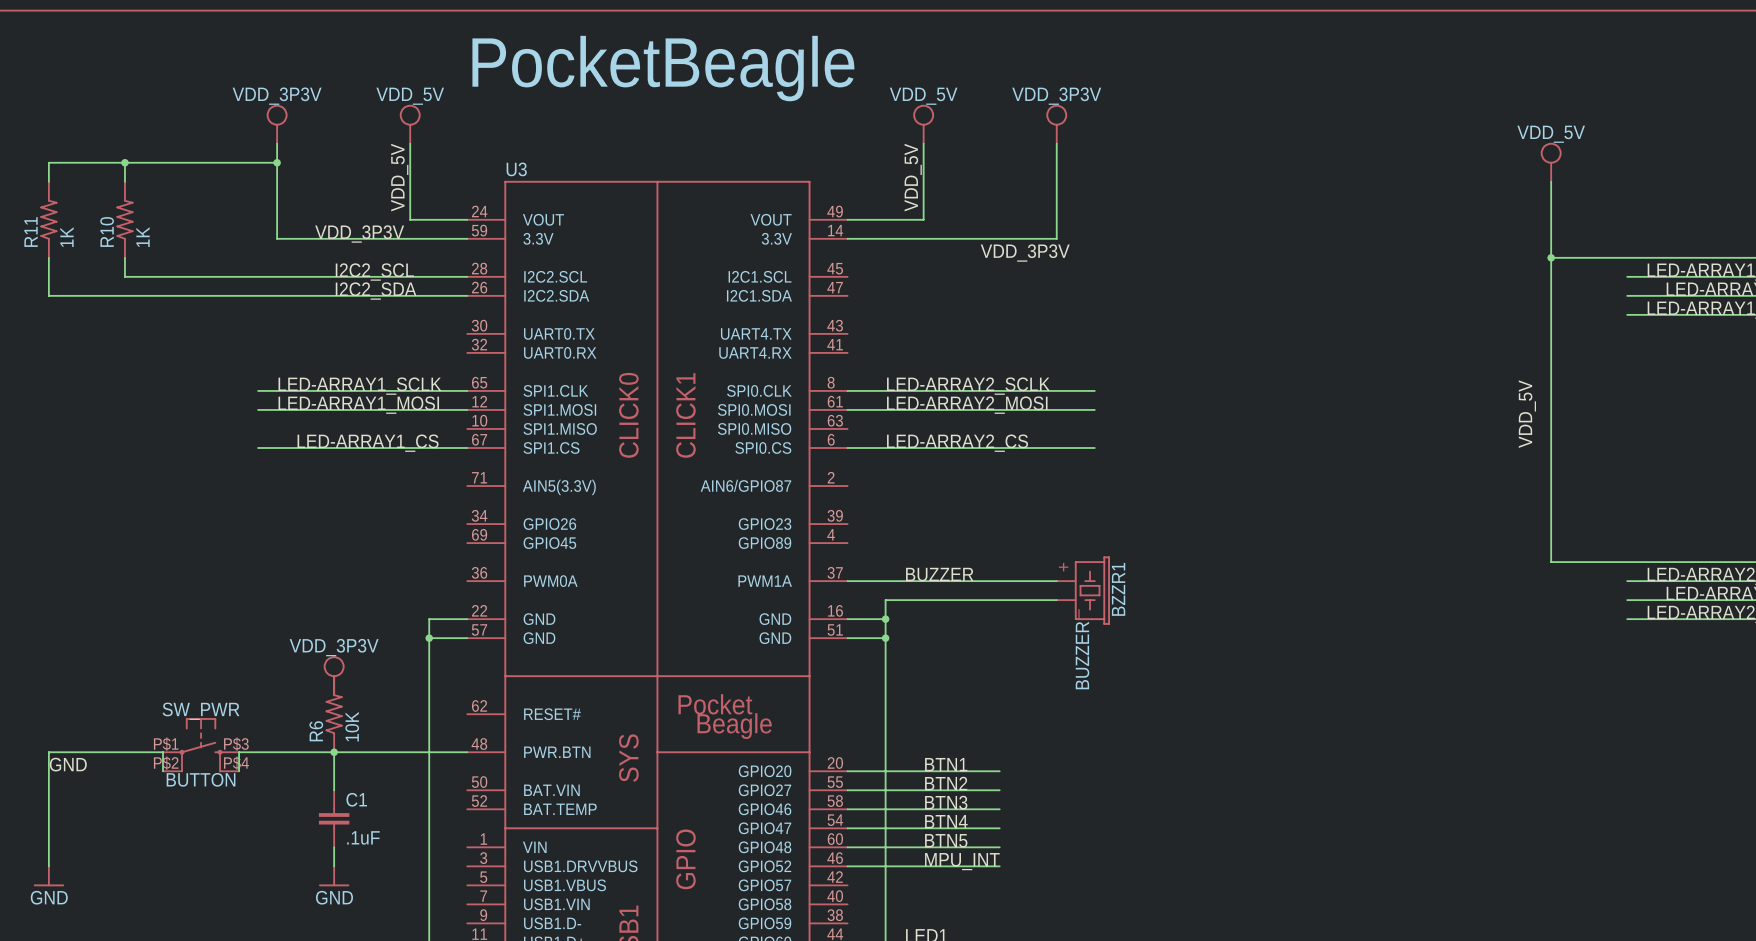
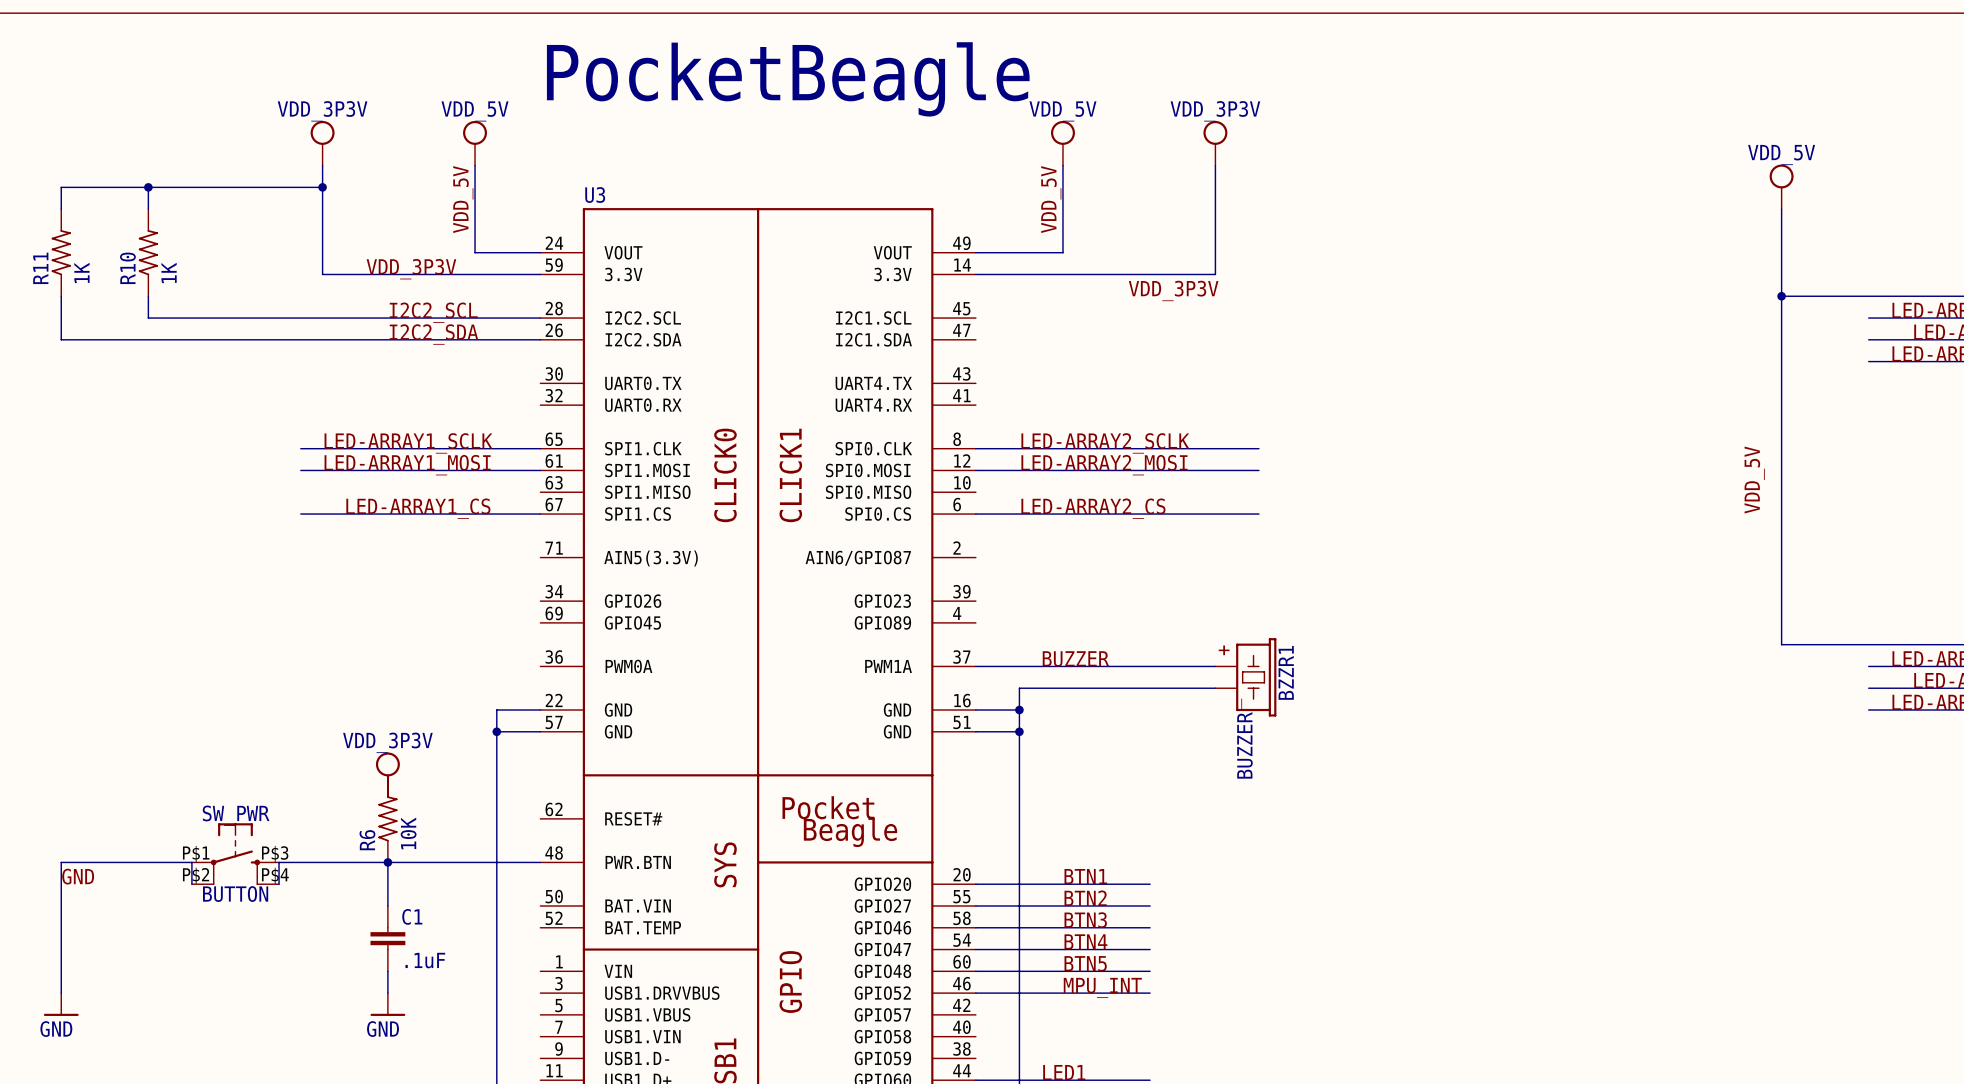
U3 pin number: 12 (479, 401) -> 61 (554, 461)
U3 pin number: 61 (835, 401) -> 12 (962, 460)
U3 pin number: 10 (479, 420) -> 63 (554, 482)
U3 pin number: 63 (835, 420) -> 10 (962, 482)

